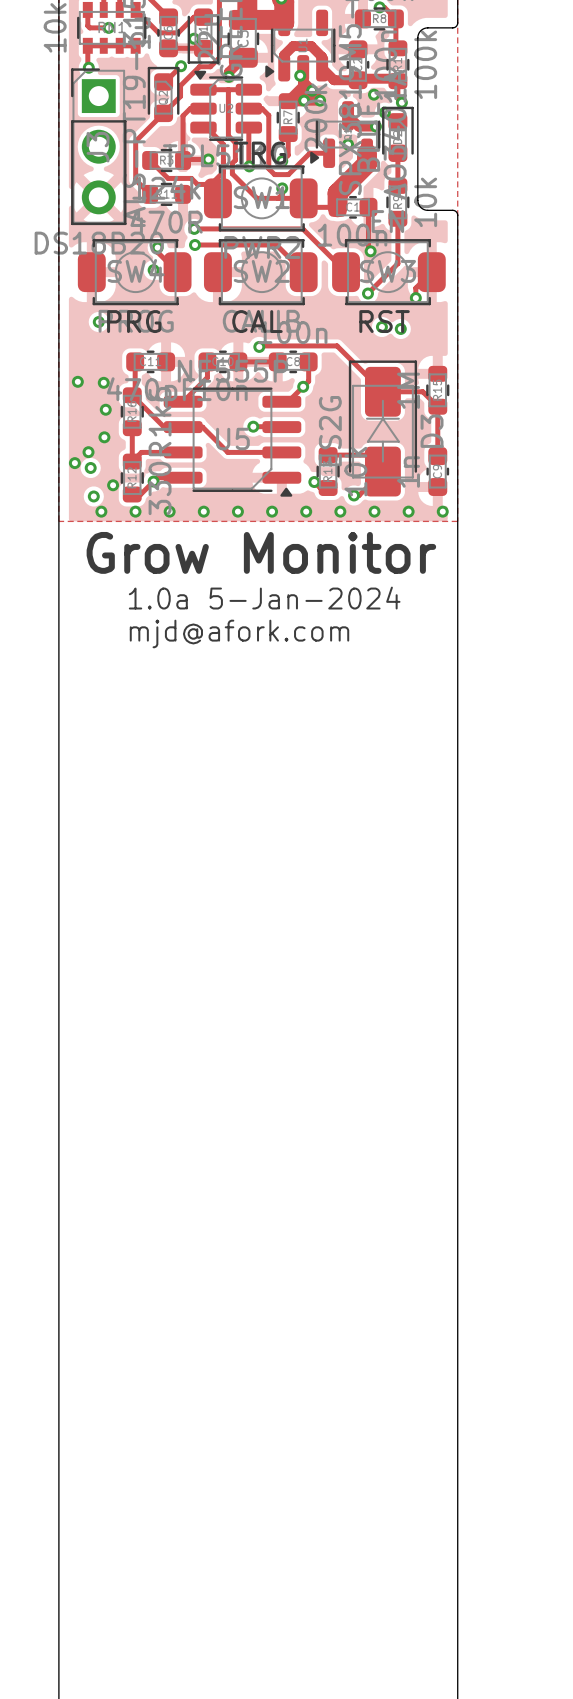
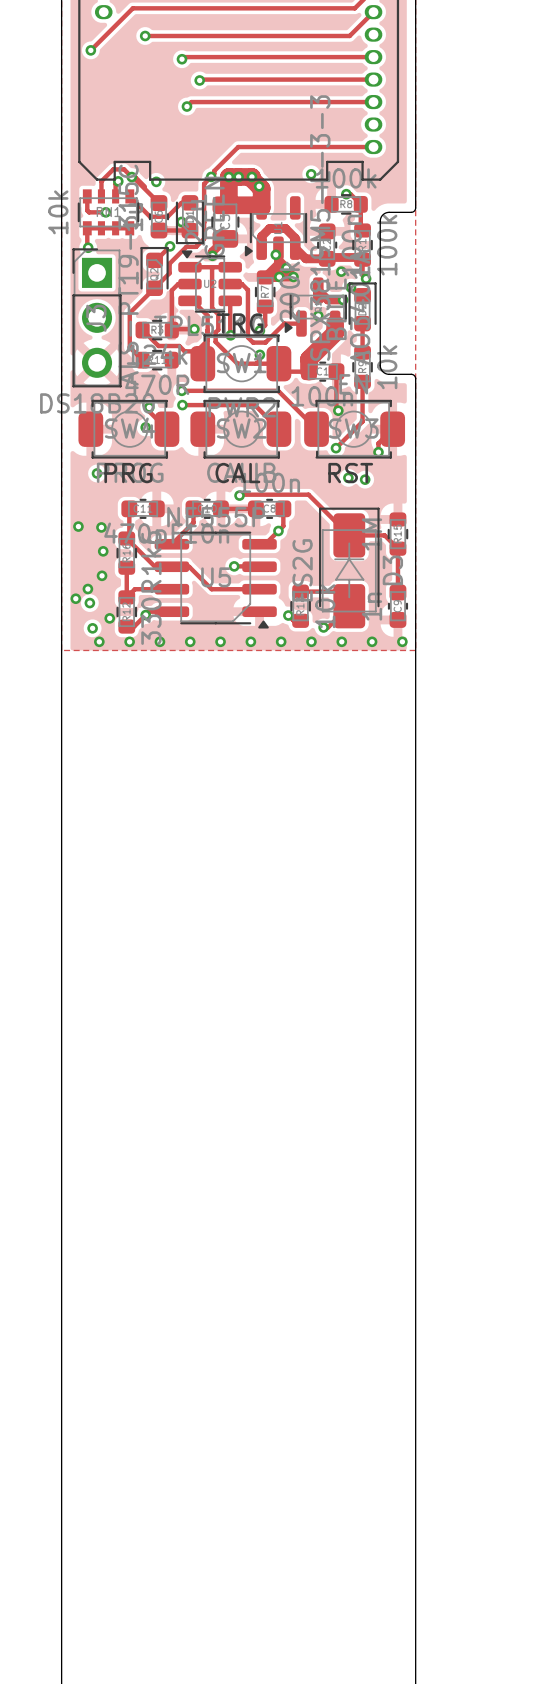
text: Grow Monitor (261, 552) -> none
text: 1.0a 5-Jan-2024 (264, 598) -> none
text: mjd@afork.com (239, 633) -> none

